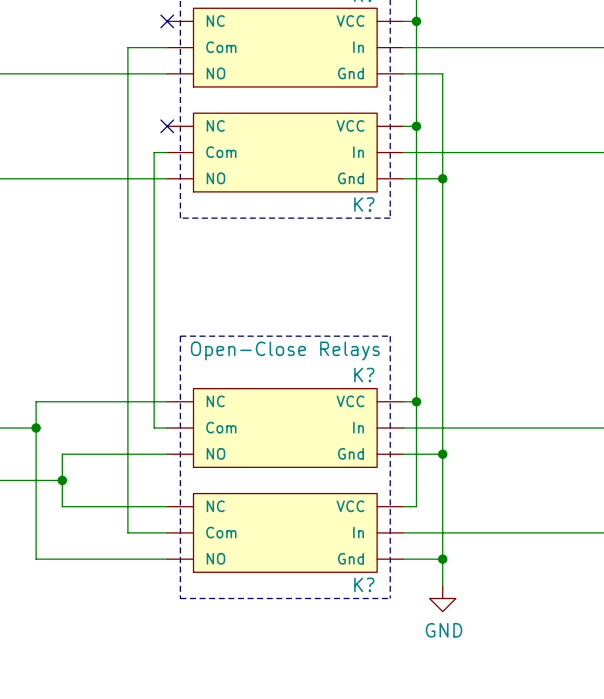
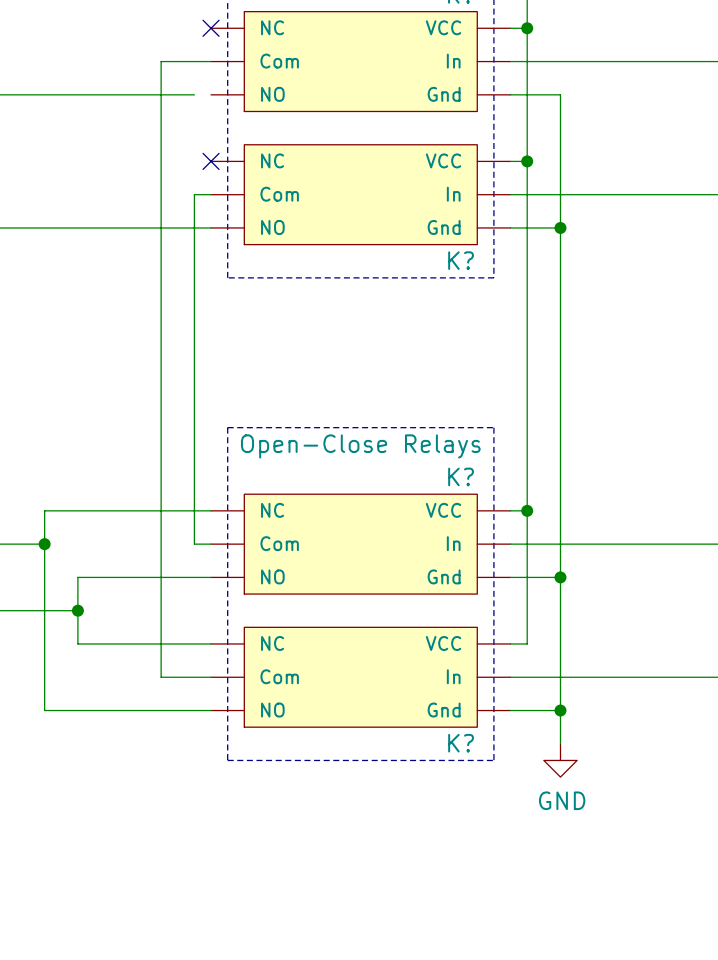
wire: (154, 73) (167, 73) -> none

